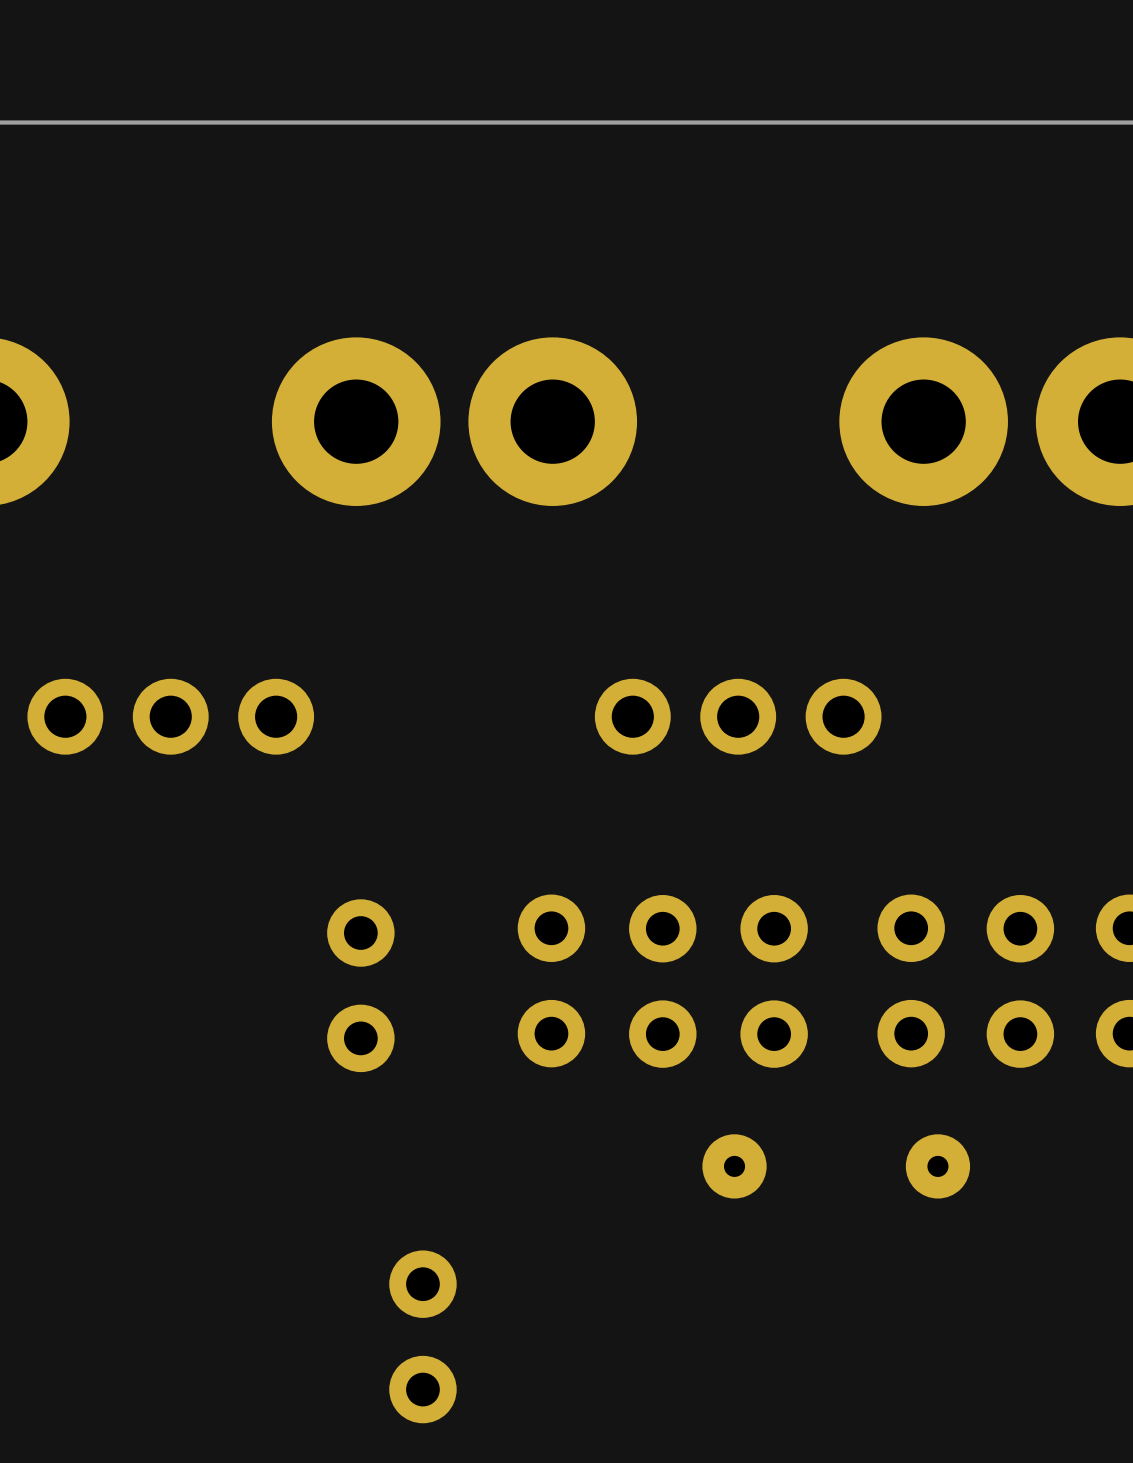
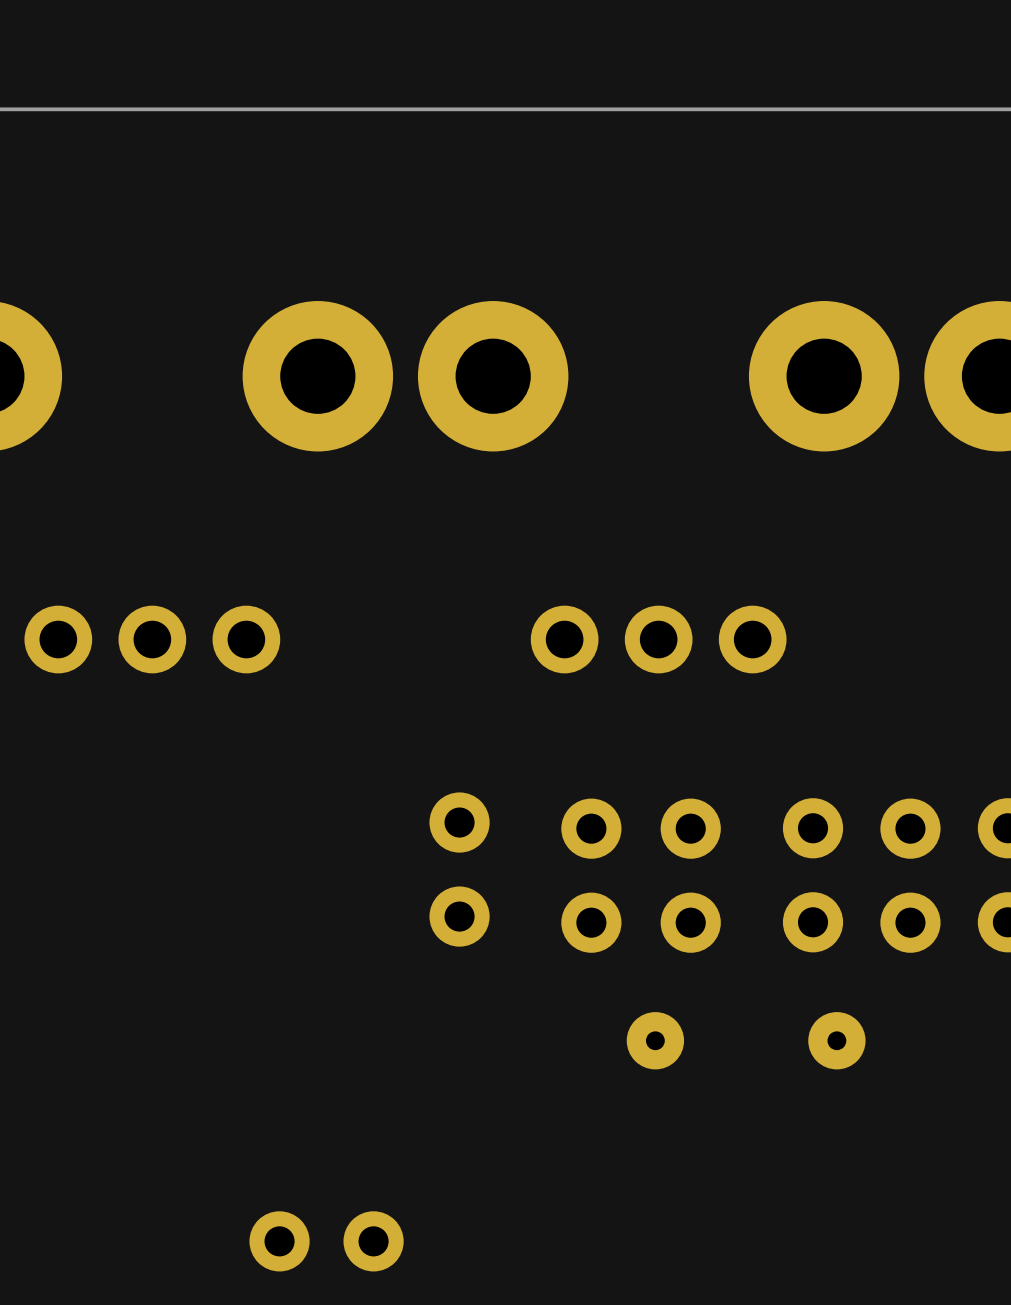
part position: (551, 980) -> (459, 869)
part: (360, 985) -> none
part rotation: 0° (422, 1336) -> 90° clockwise (326, 1241)

